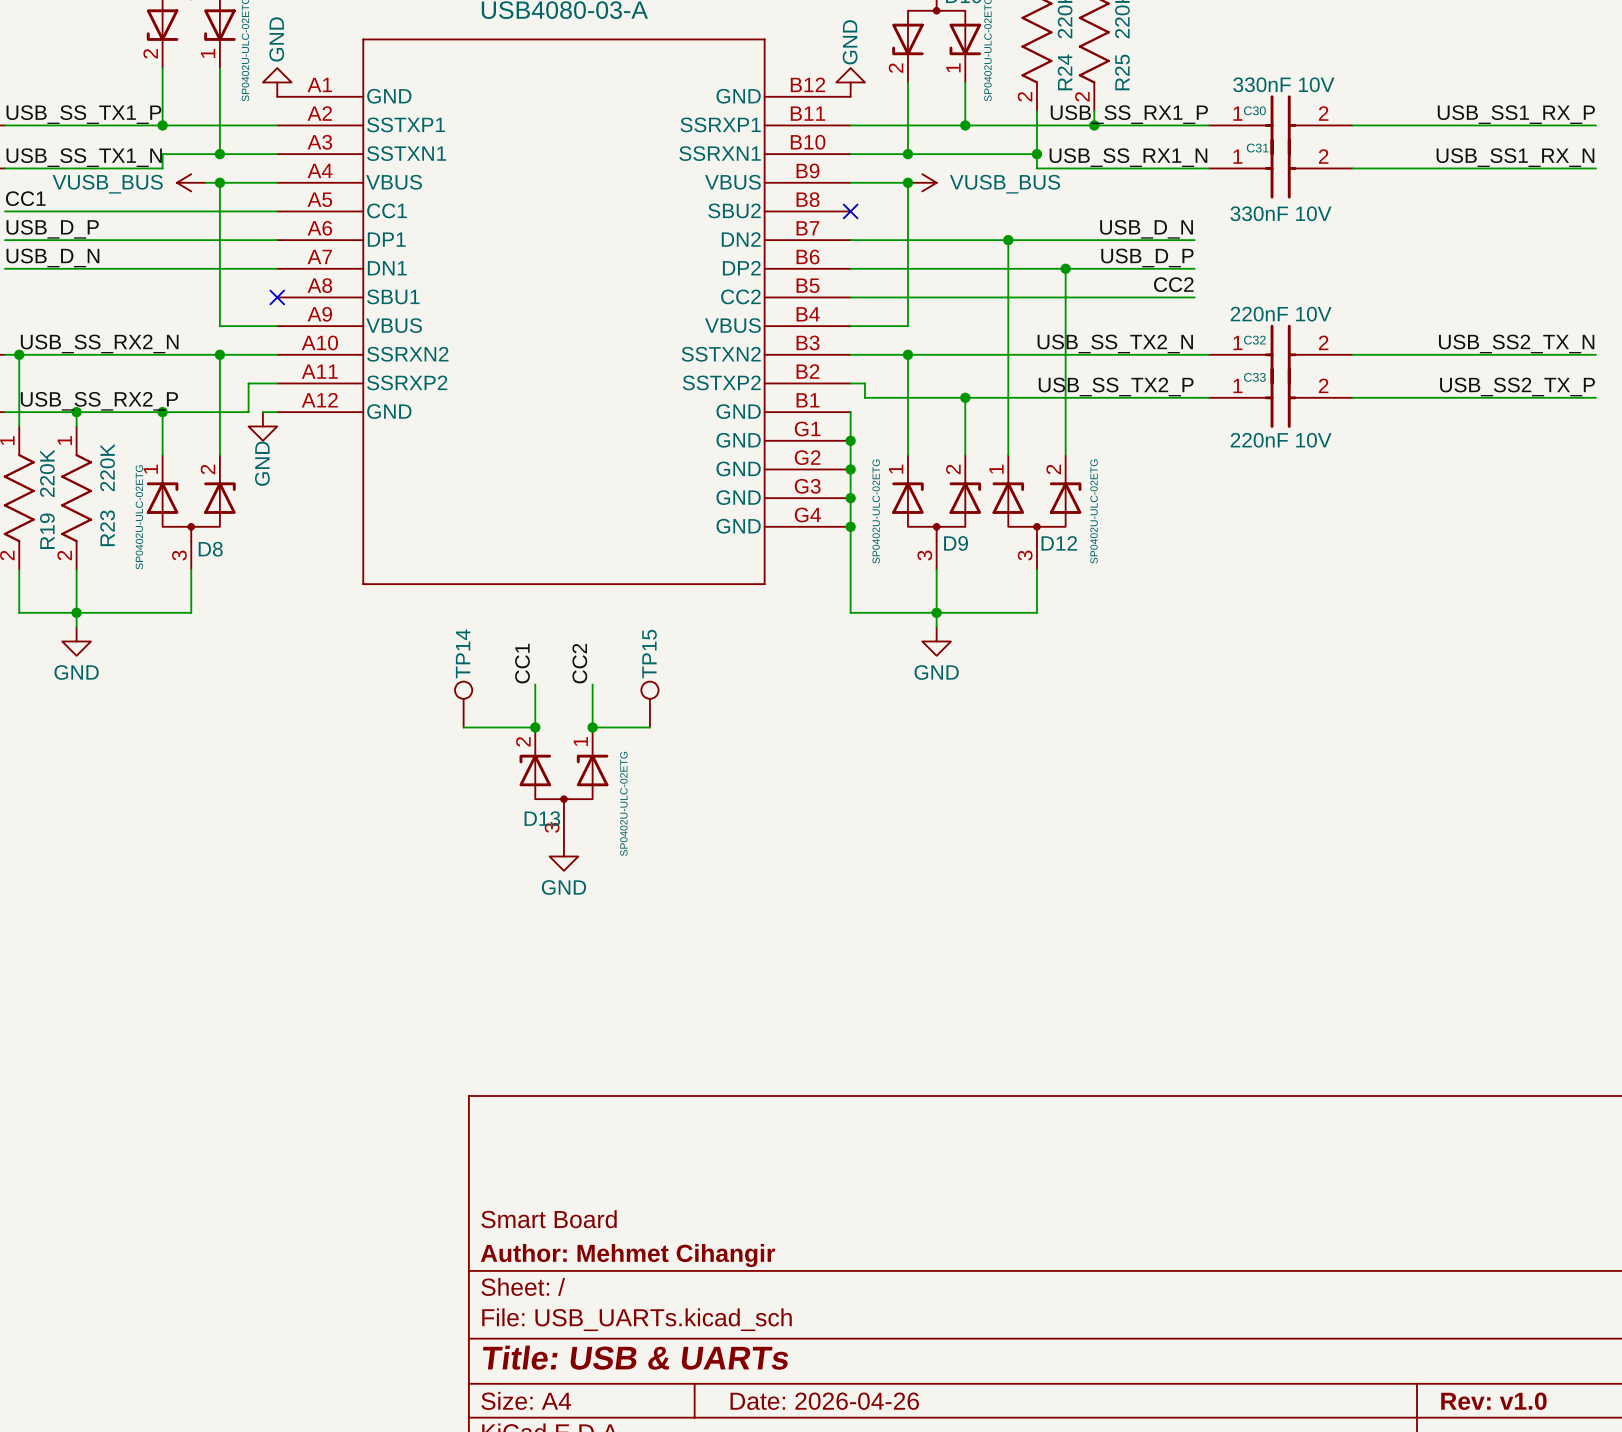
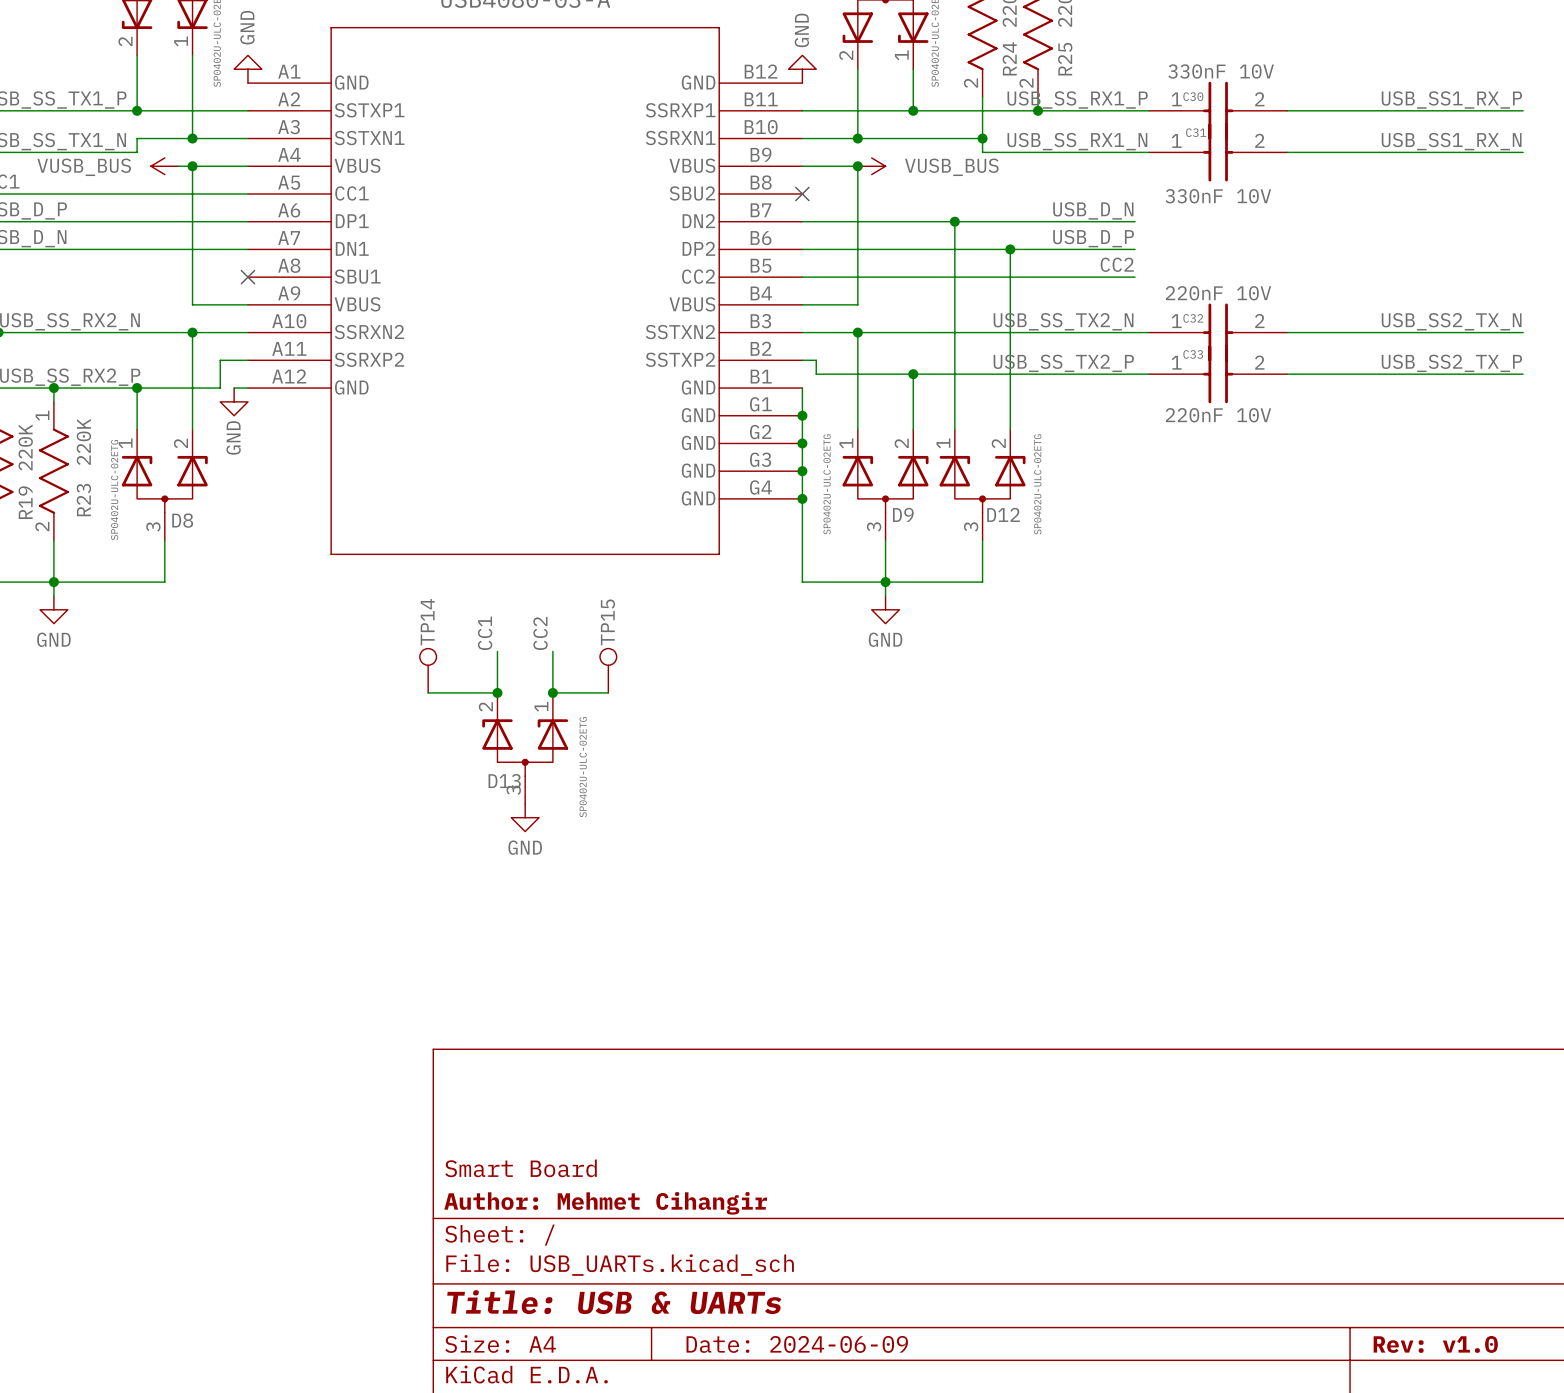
title block: Date: 2026-04-26 (824, 1401) -> Date: 2024-06-09 (797, 1344)

